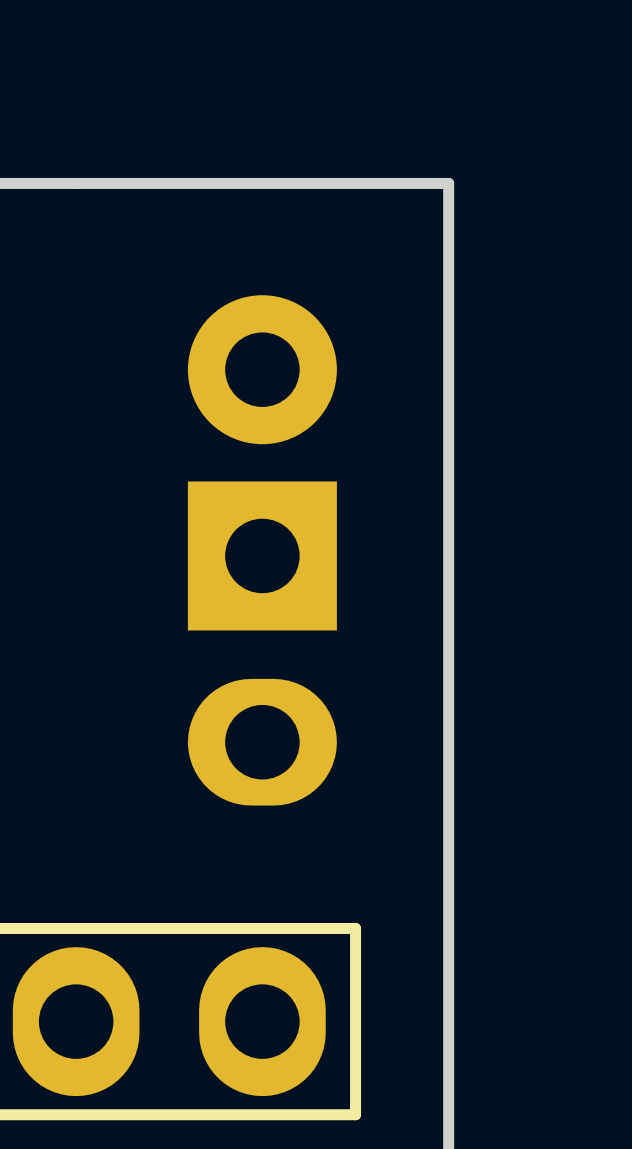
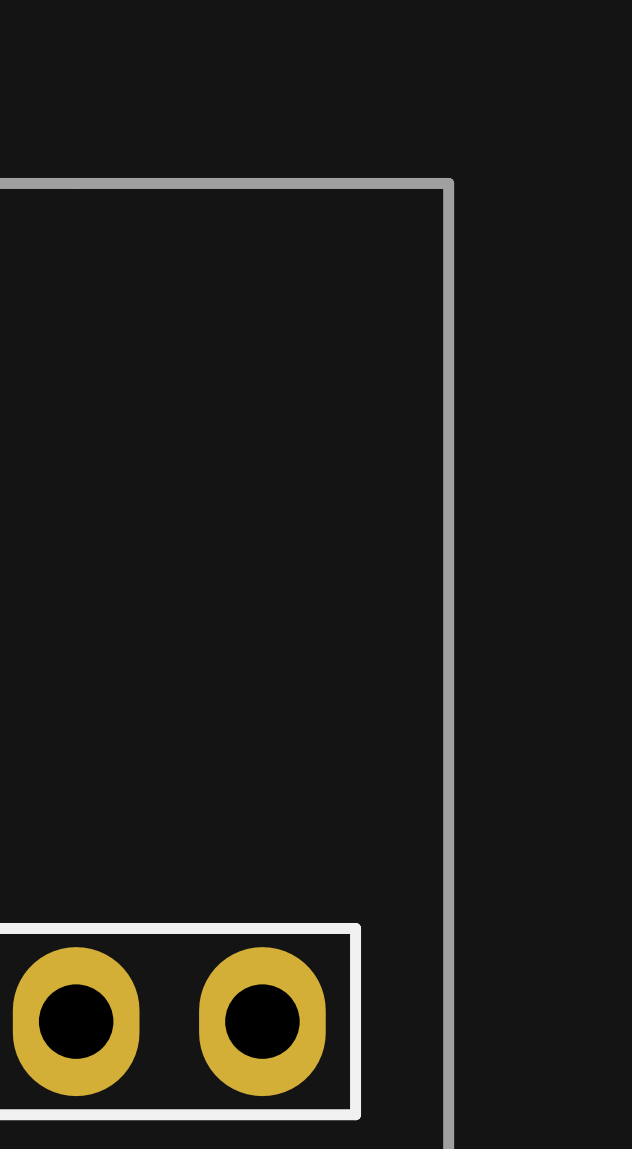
part: (262, 462) -> none
part: (262, 742) -> none

